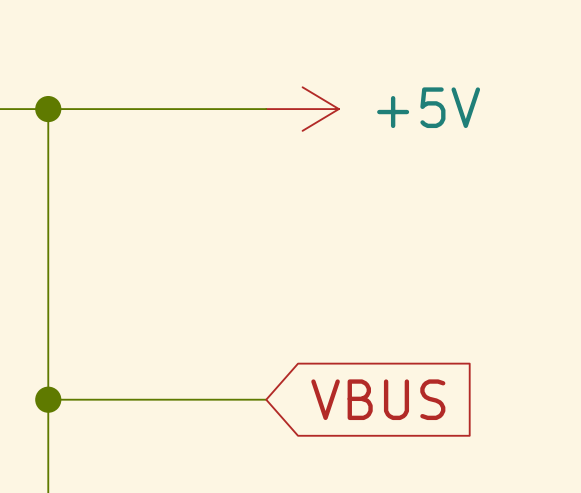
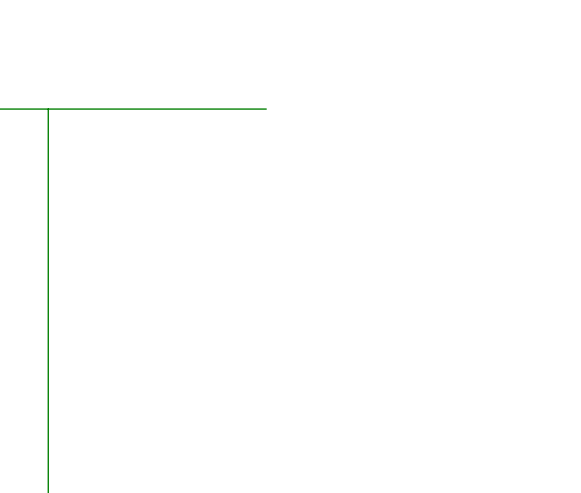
junction: (48, 109) -> none
power symbol: +5V (302, 109) -> none
wire: (48, 399) (266, 399) -> none
junction: (48, 399) -> none
global label: VBUS (378, 399) -> none

